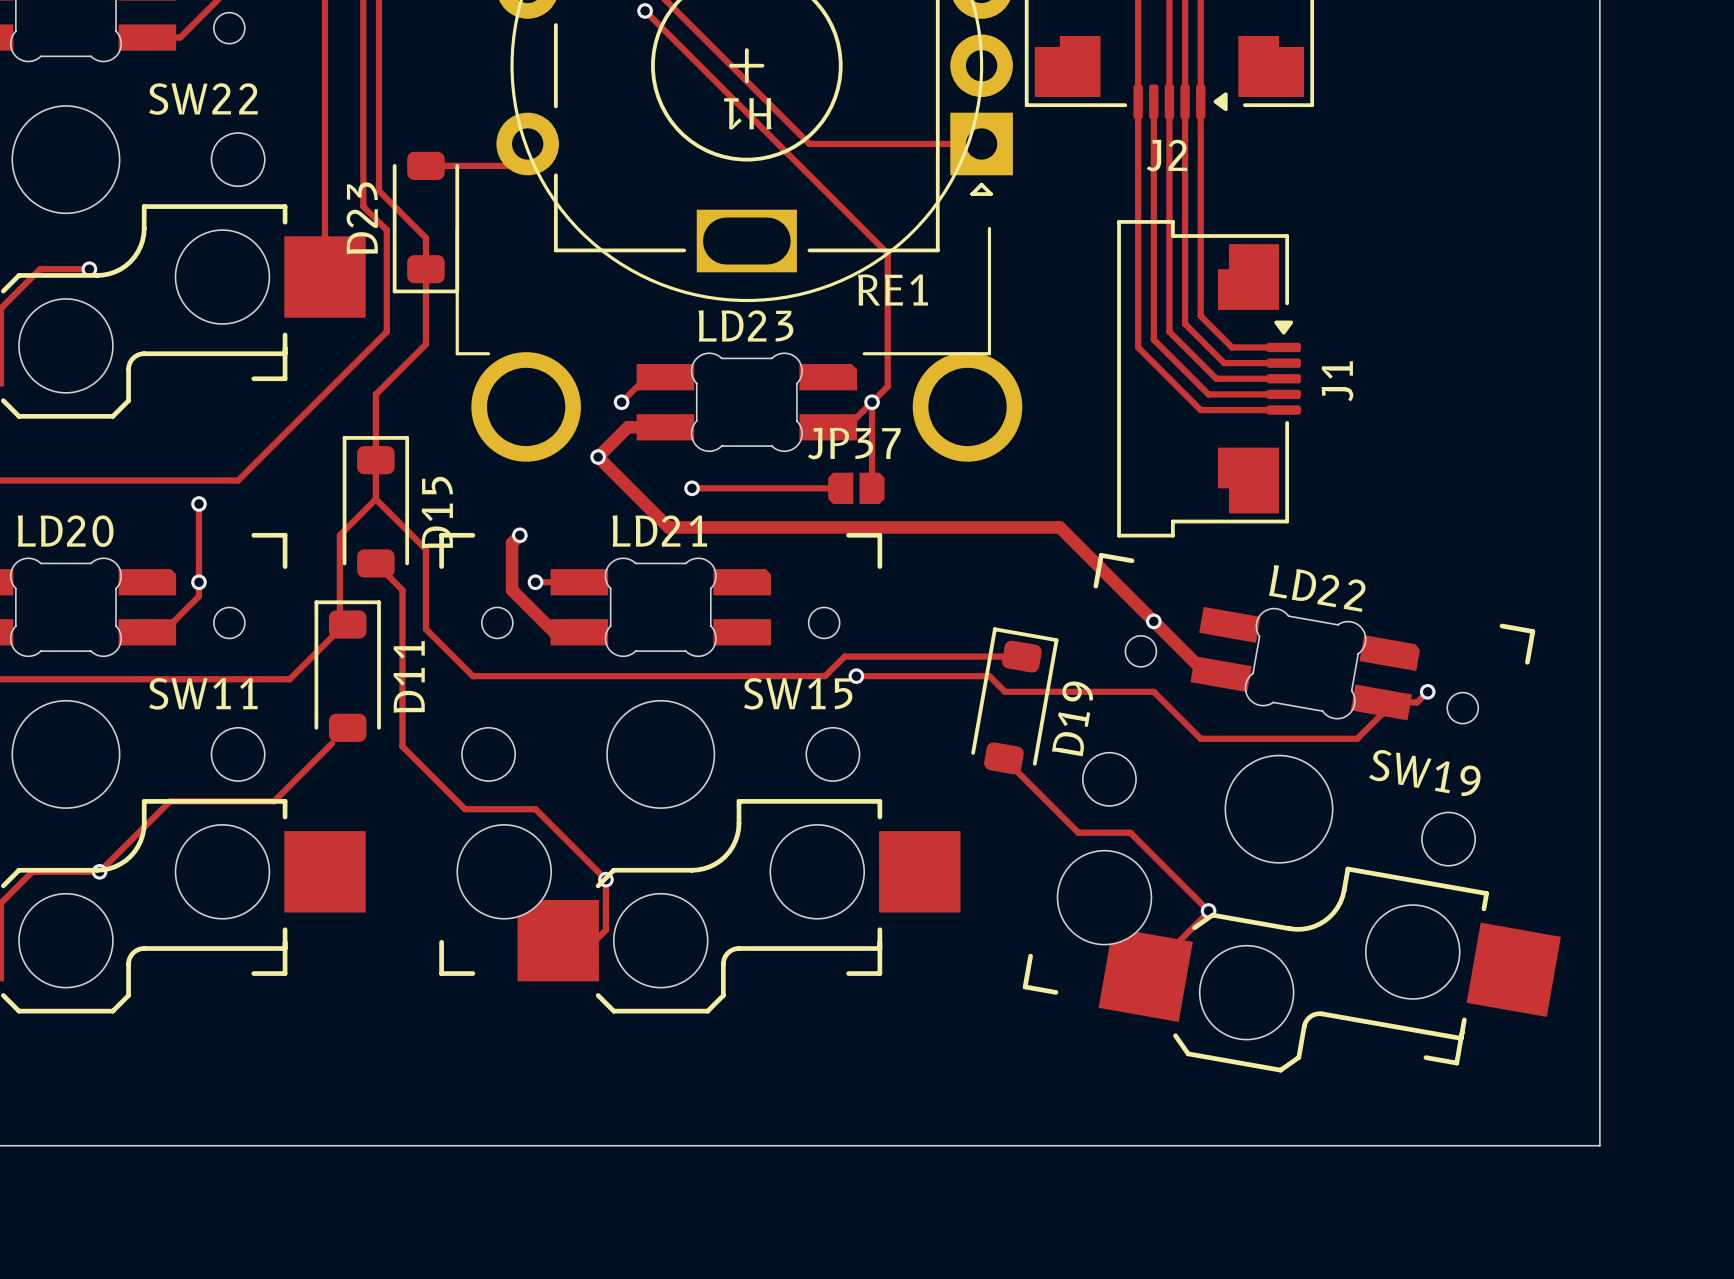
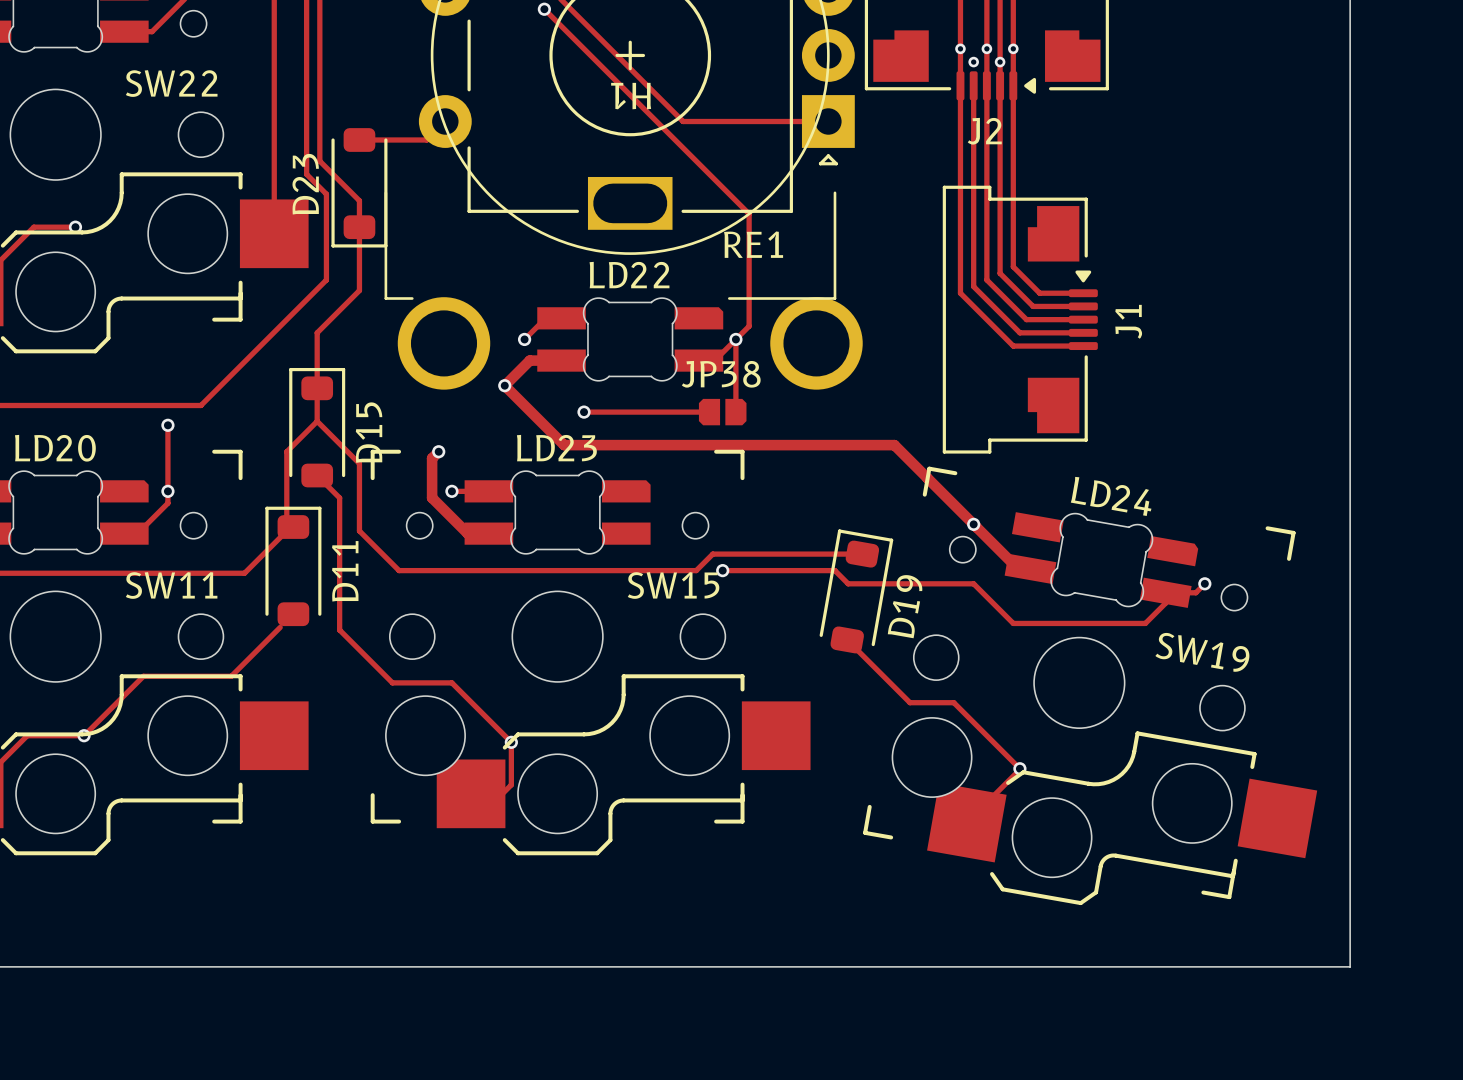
via: none -> (960, 48)
via: none -> (986, 48)
via: none -> (1013, 48)
via: none -> (973, 62)
via: none -> (1000, 62)
LD23 name: LD23 (745, 325) -> LD22 (629, 275)
JP37 name: JP37 (854, 443) -> JP38 (721, 374)
LD21 name: LD21 (659, 530) -> LD23 (556, 448)
LD22 name: LD22 (1317, 588) -> LD24 (1111, 496)

